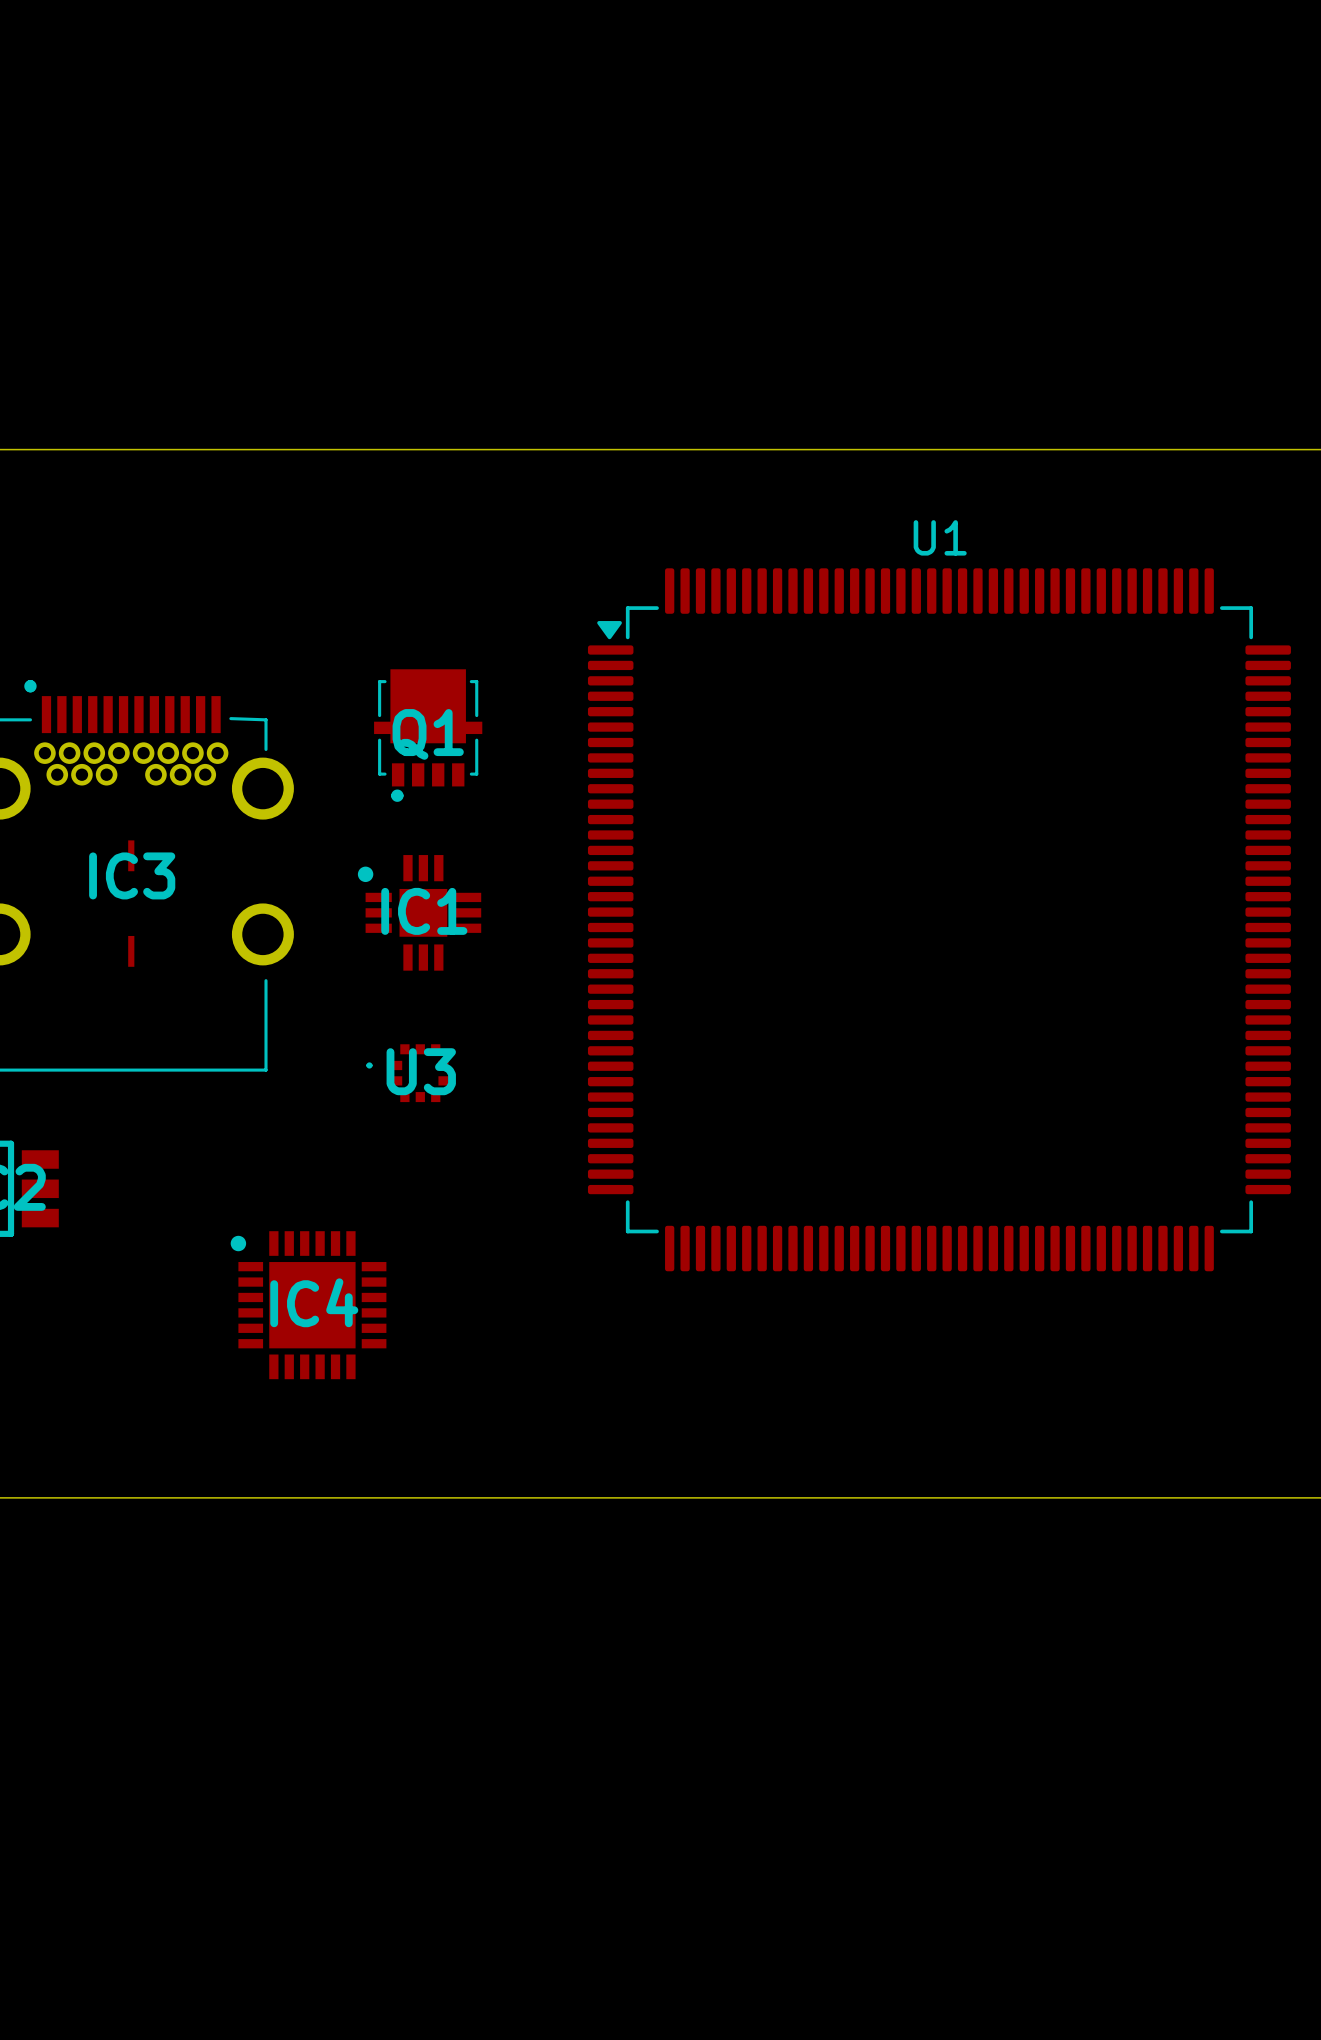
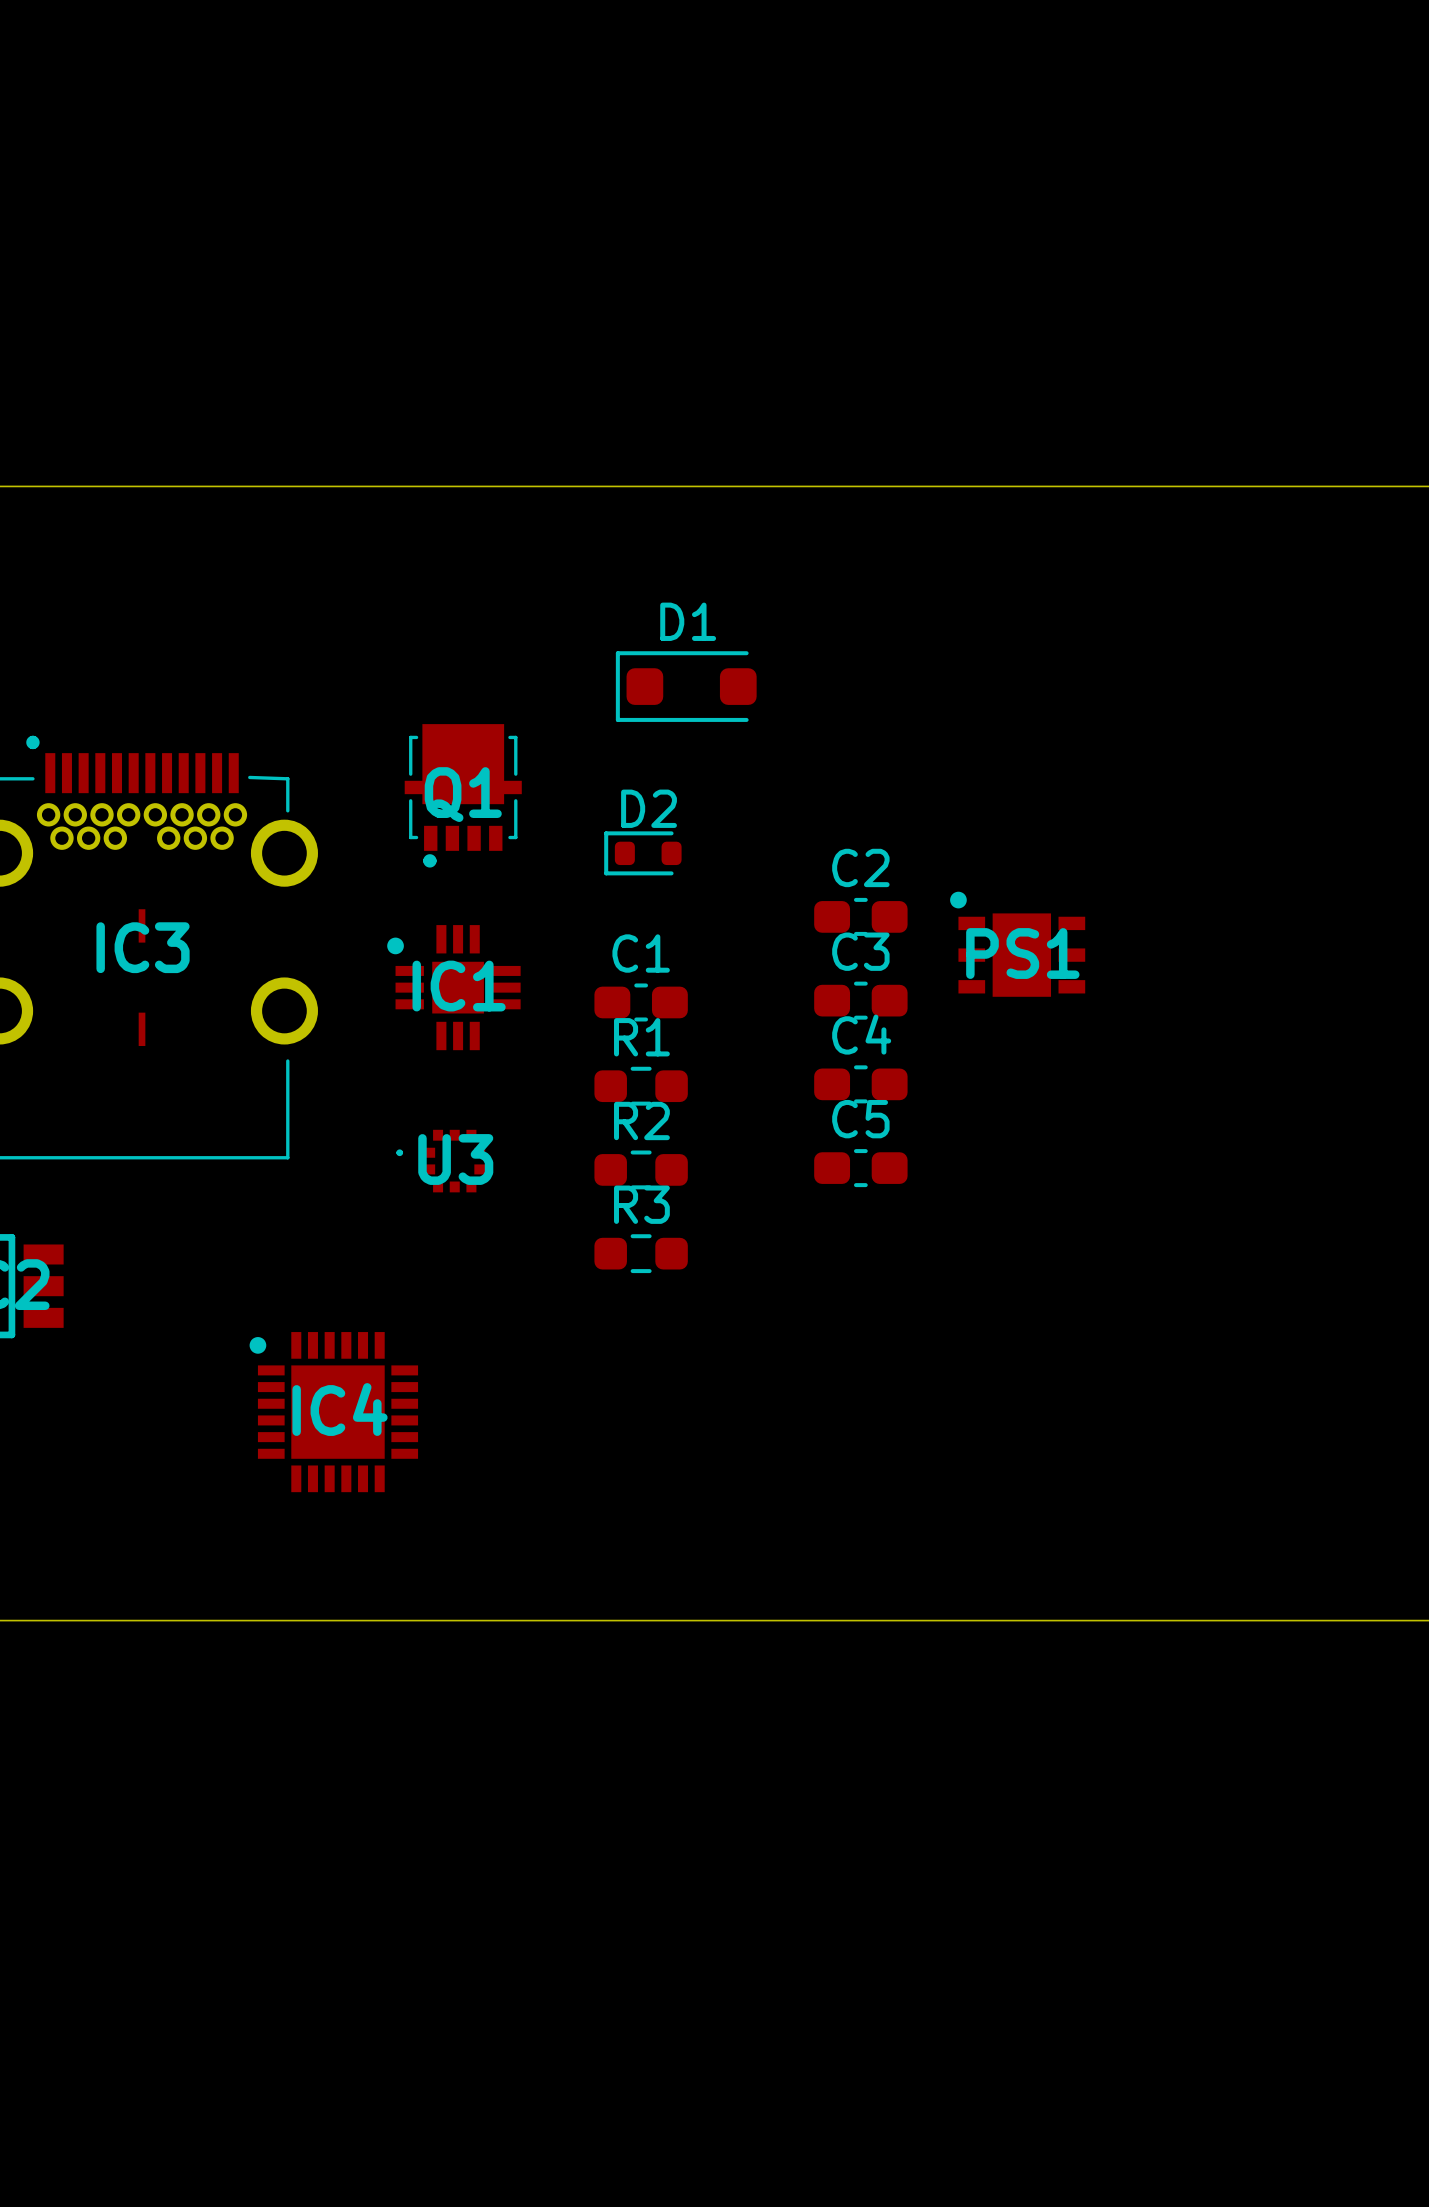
D1: none -> (686, 686)
D2: none -> (642, 853)
C2: none -> (860, 916)
PS1: none -> (1017, 944)
U1: (939, 919) -> none
C3: none -> (860, 1000)
C1: none -> (641, 1002)
C4: none -> (860, 1084)
R1: none -> (641, 1086)
C5: none -> (860, 1168)
R2: none -> (641, 1169)
R3: none -> (641, 1253)

